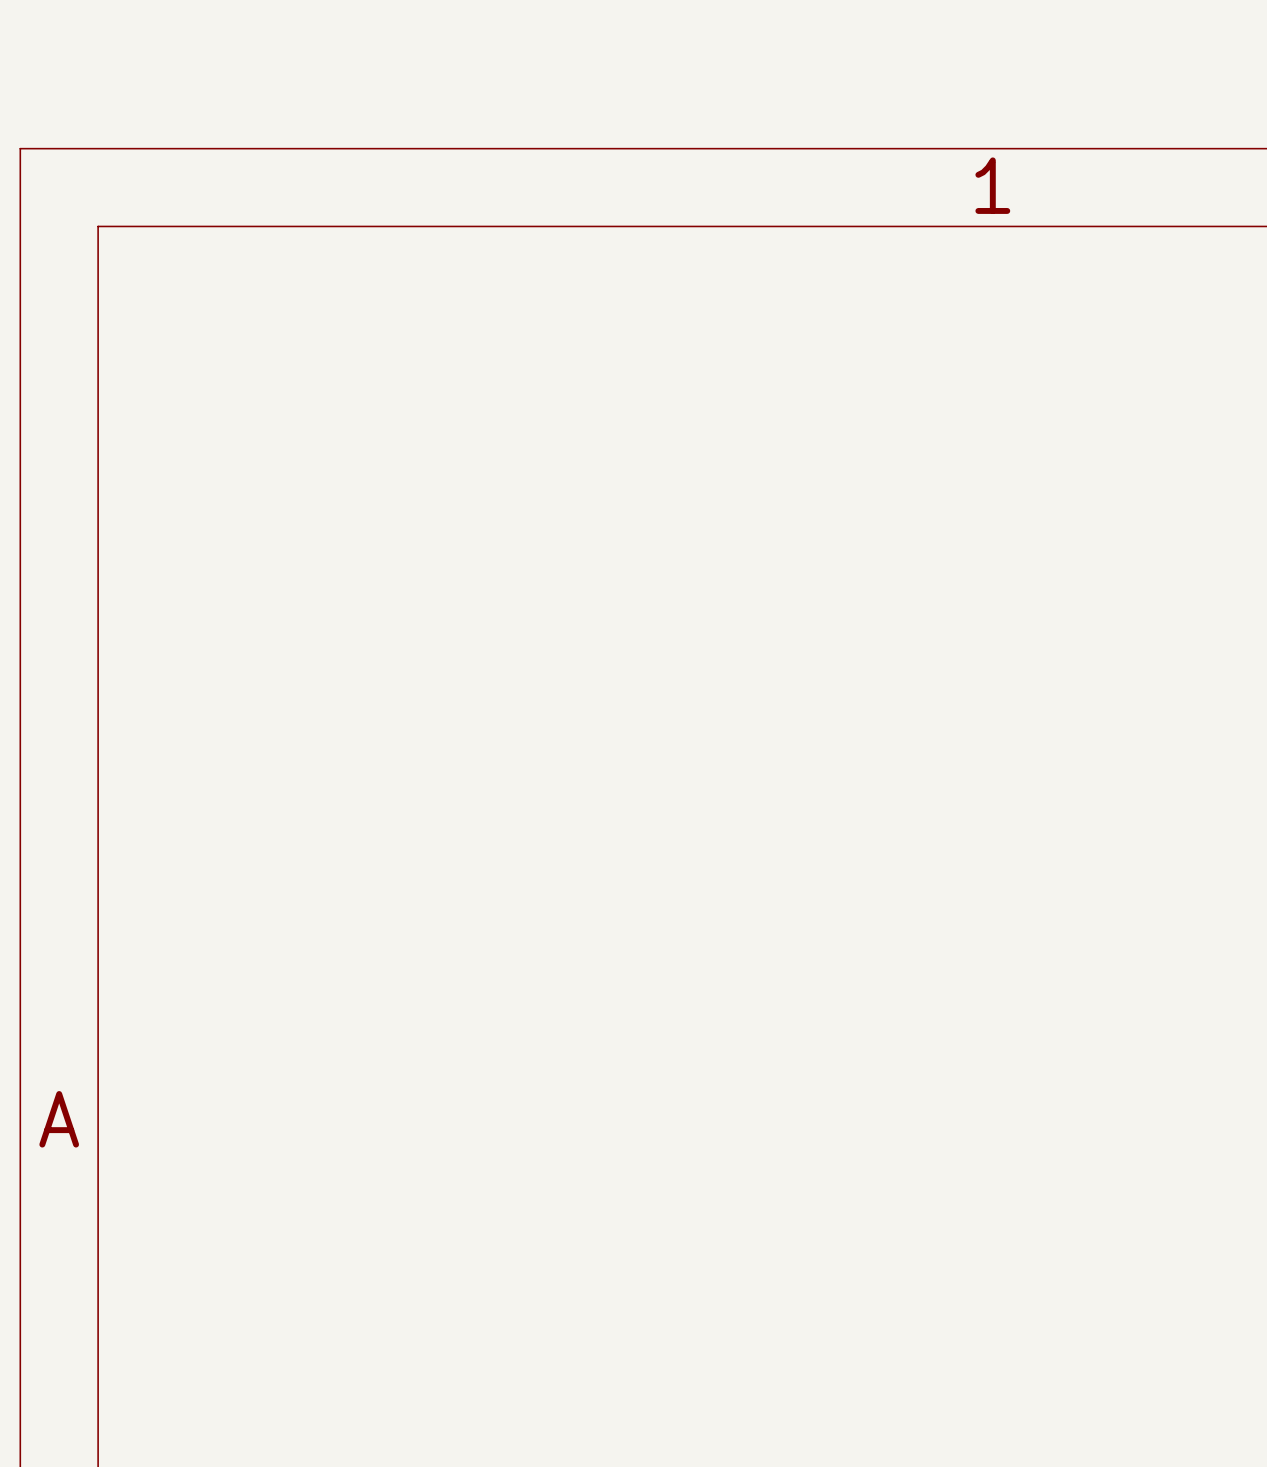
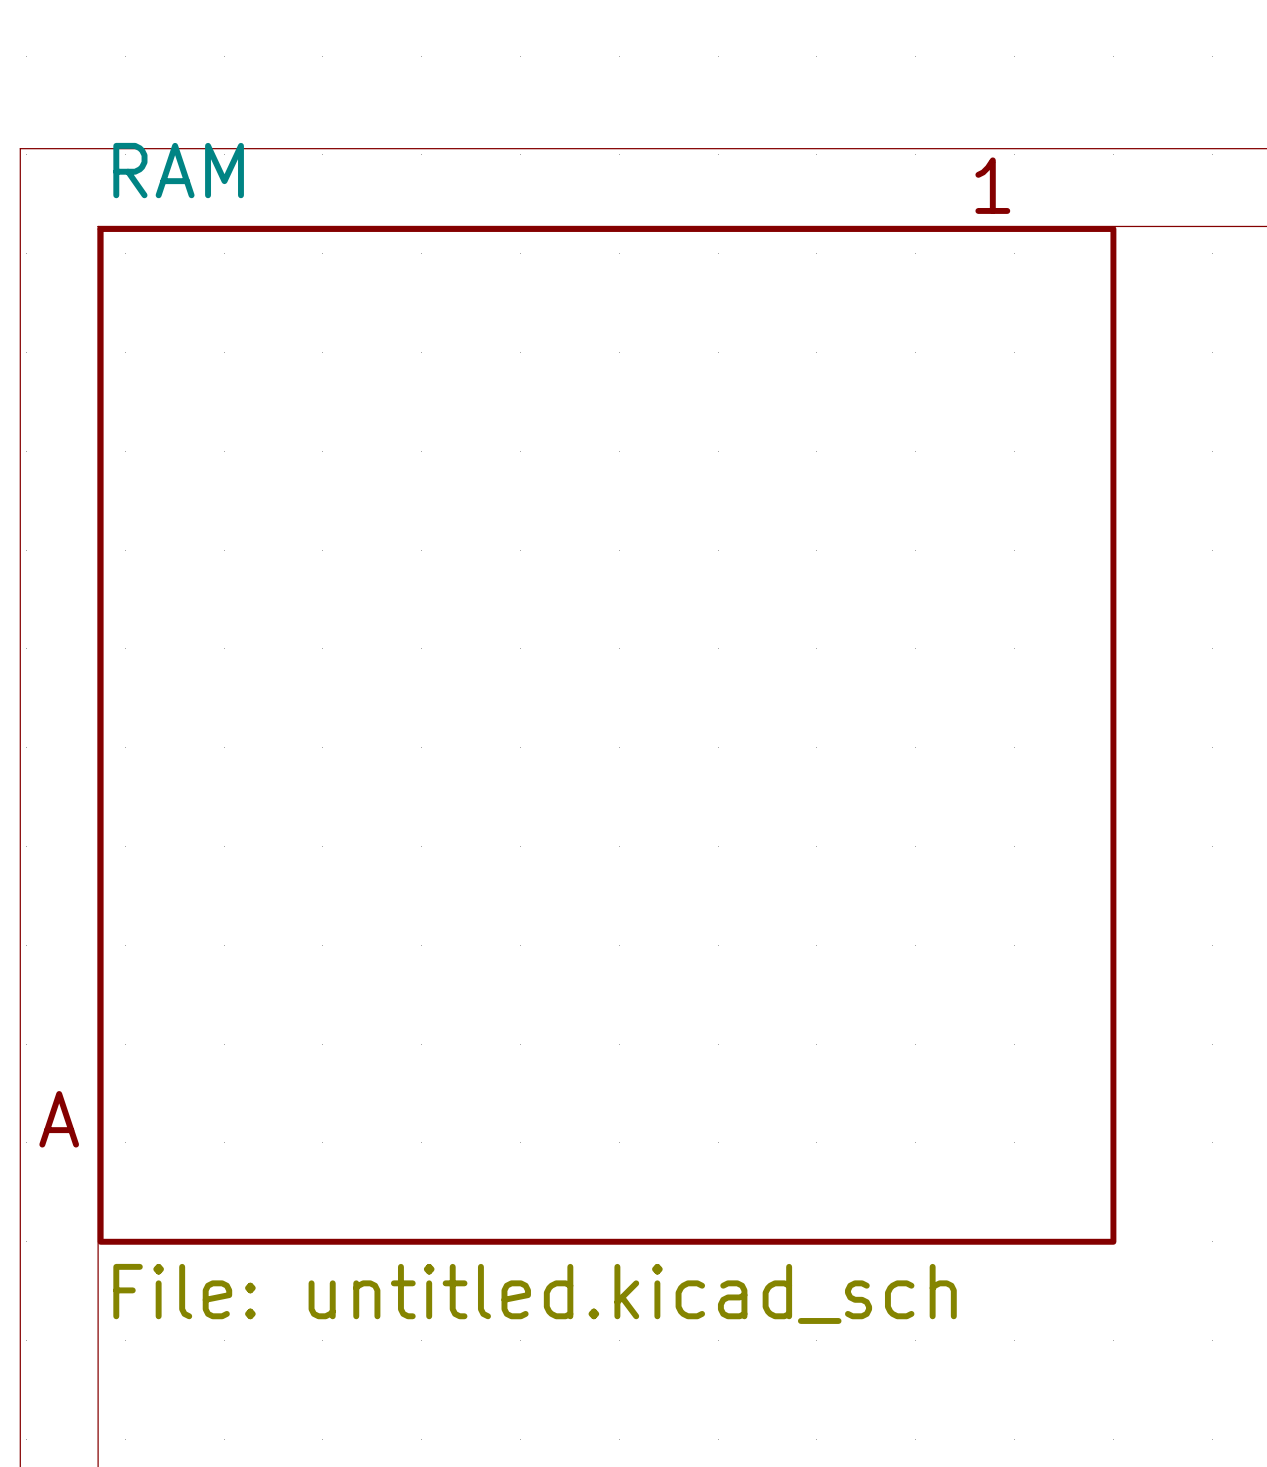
sheet RAM: none -> File: untitled.kicad_sch (607, 735)

